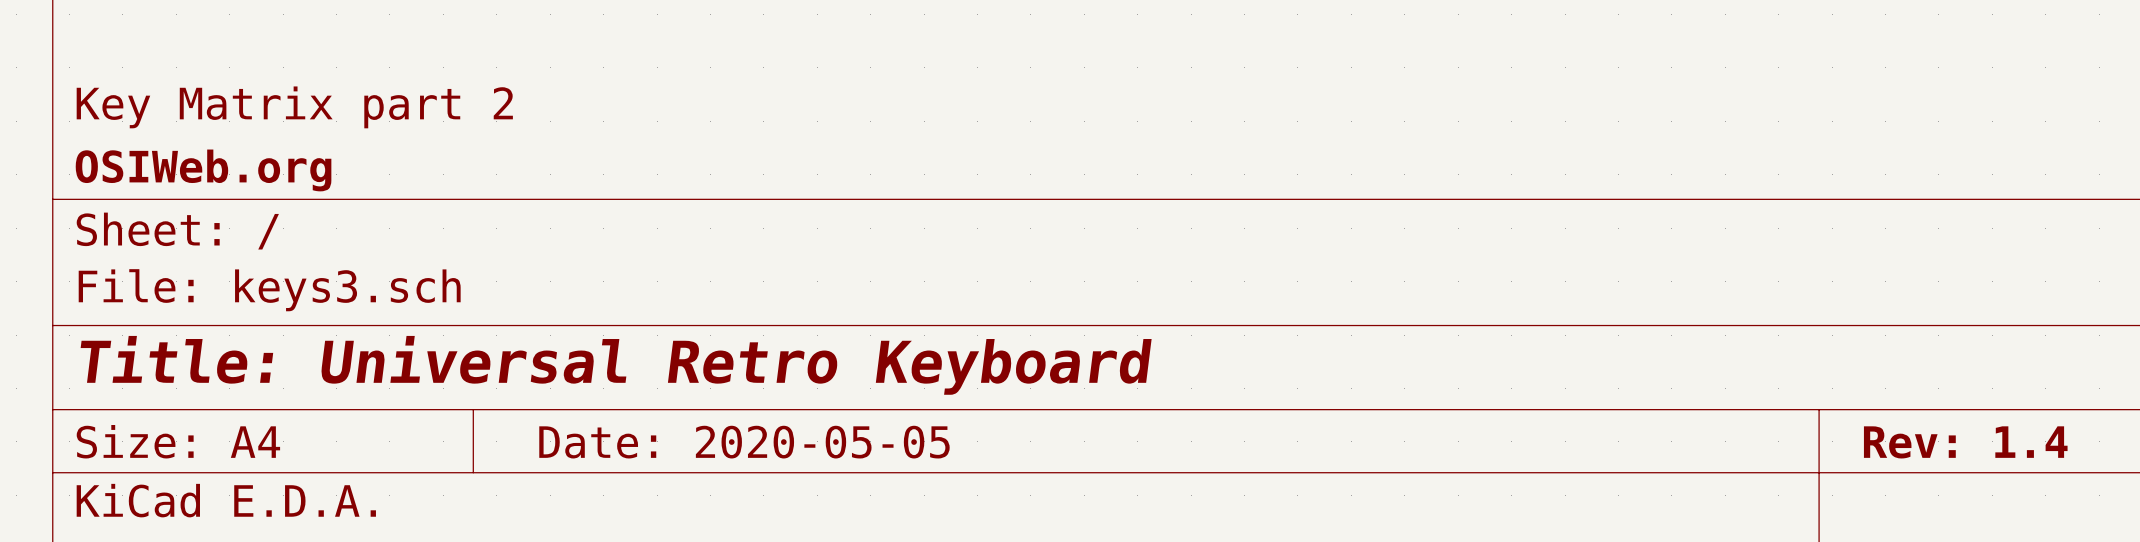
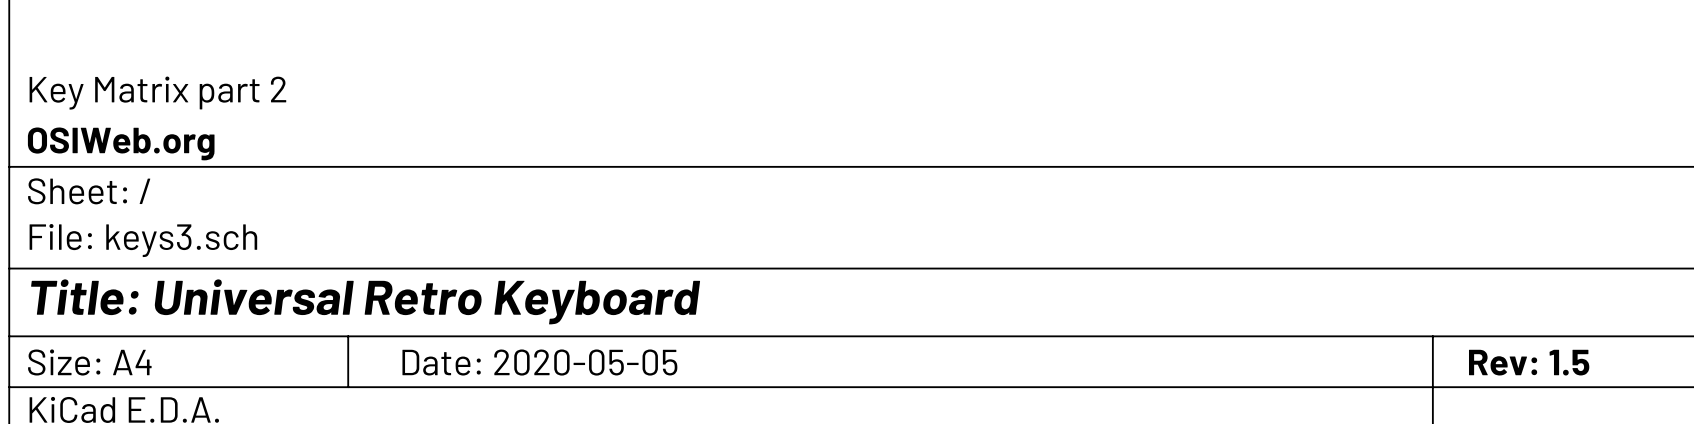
title block: Rev: 1.4 (1965, 442) -> Rev: 1.5 (1529, 362)

